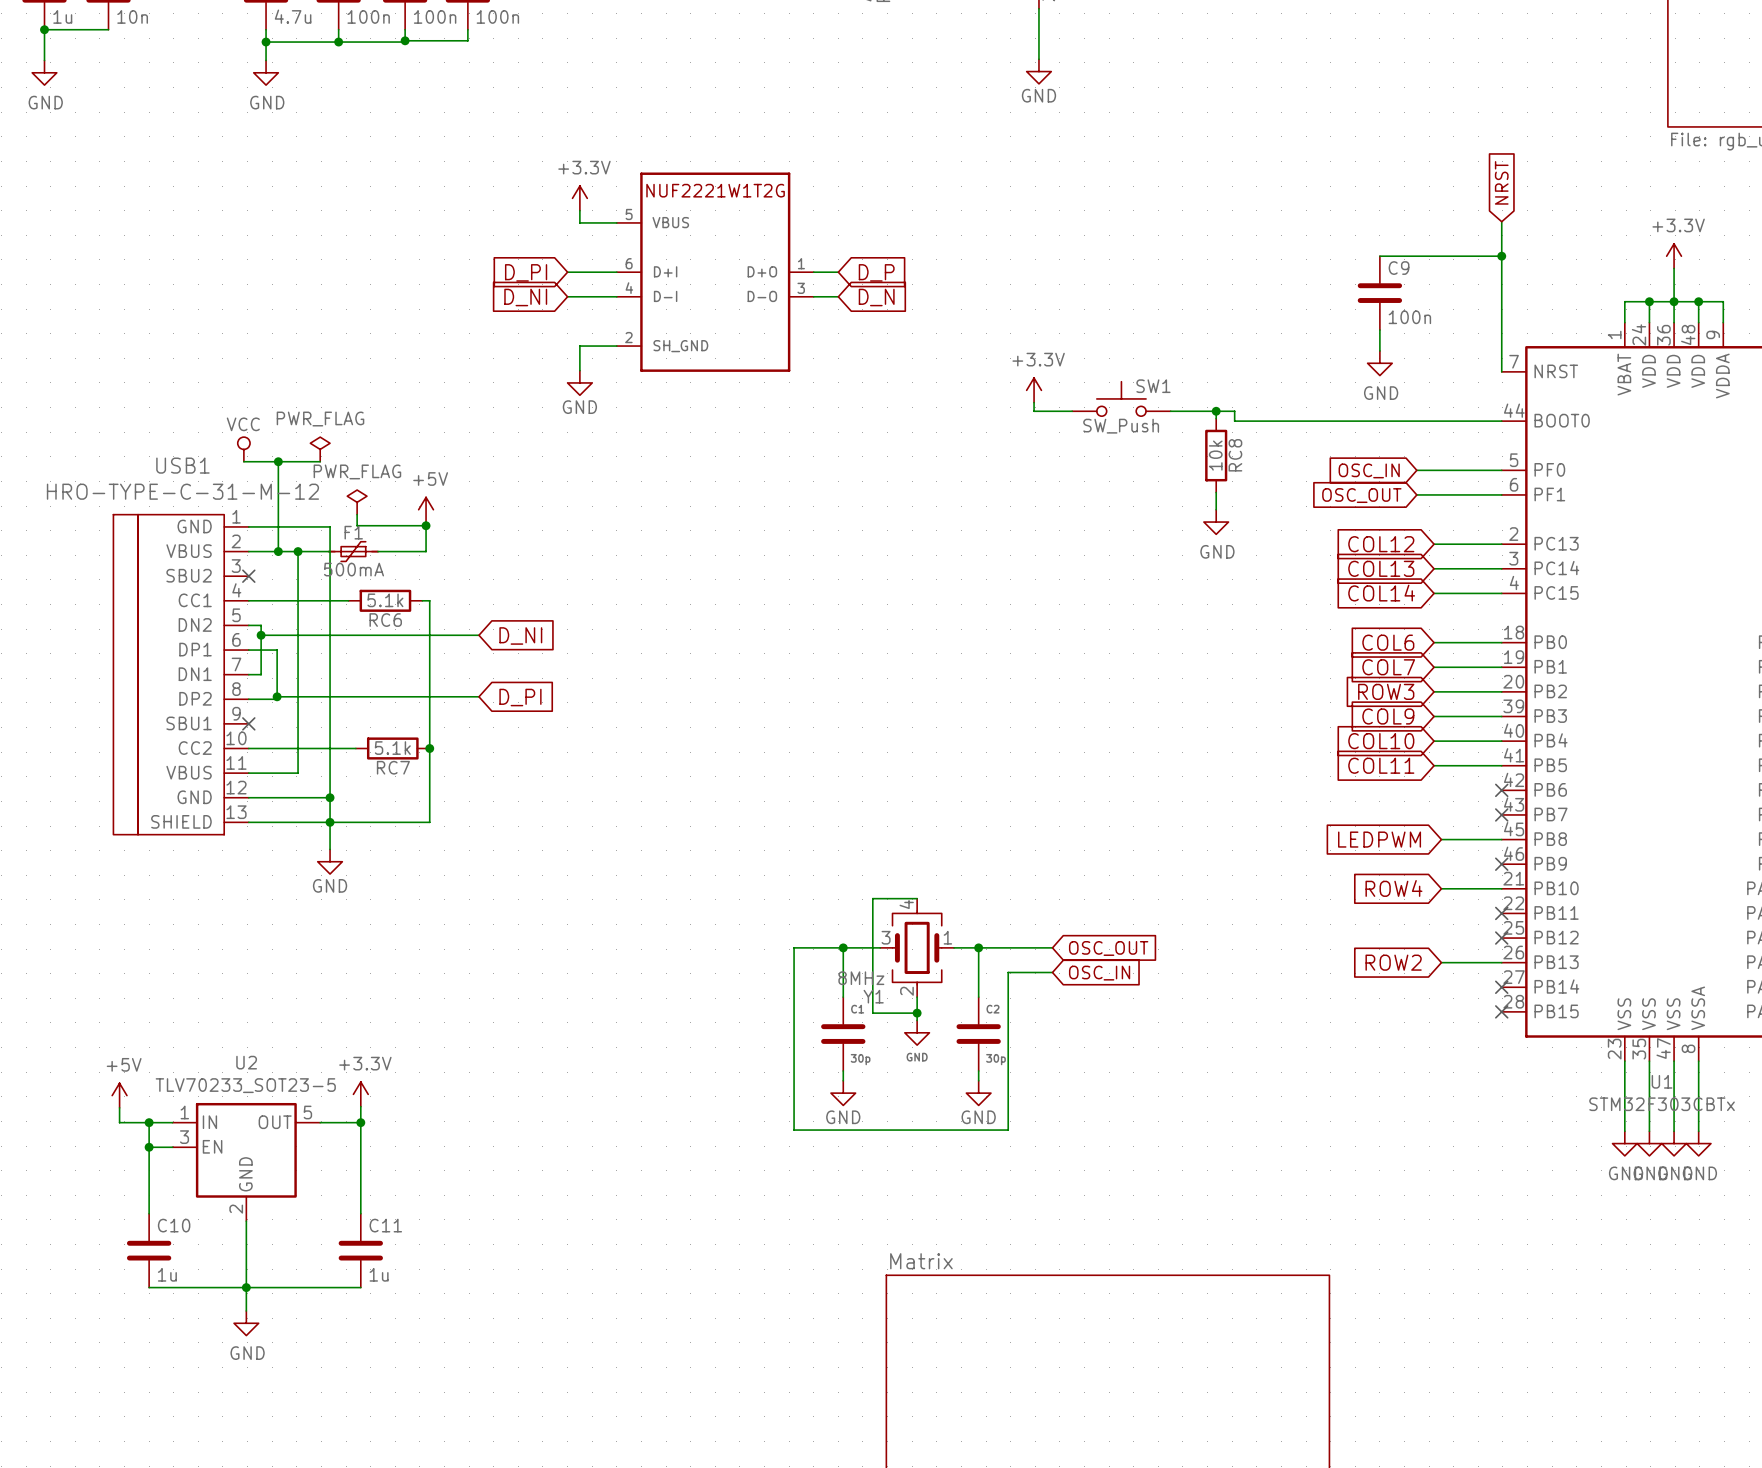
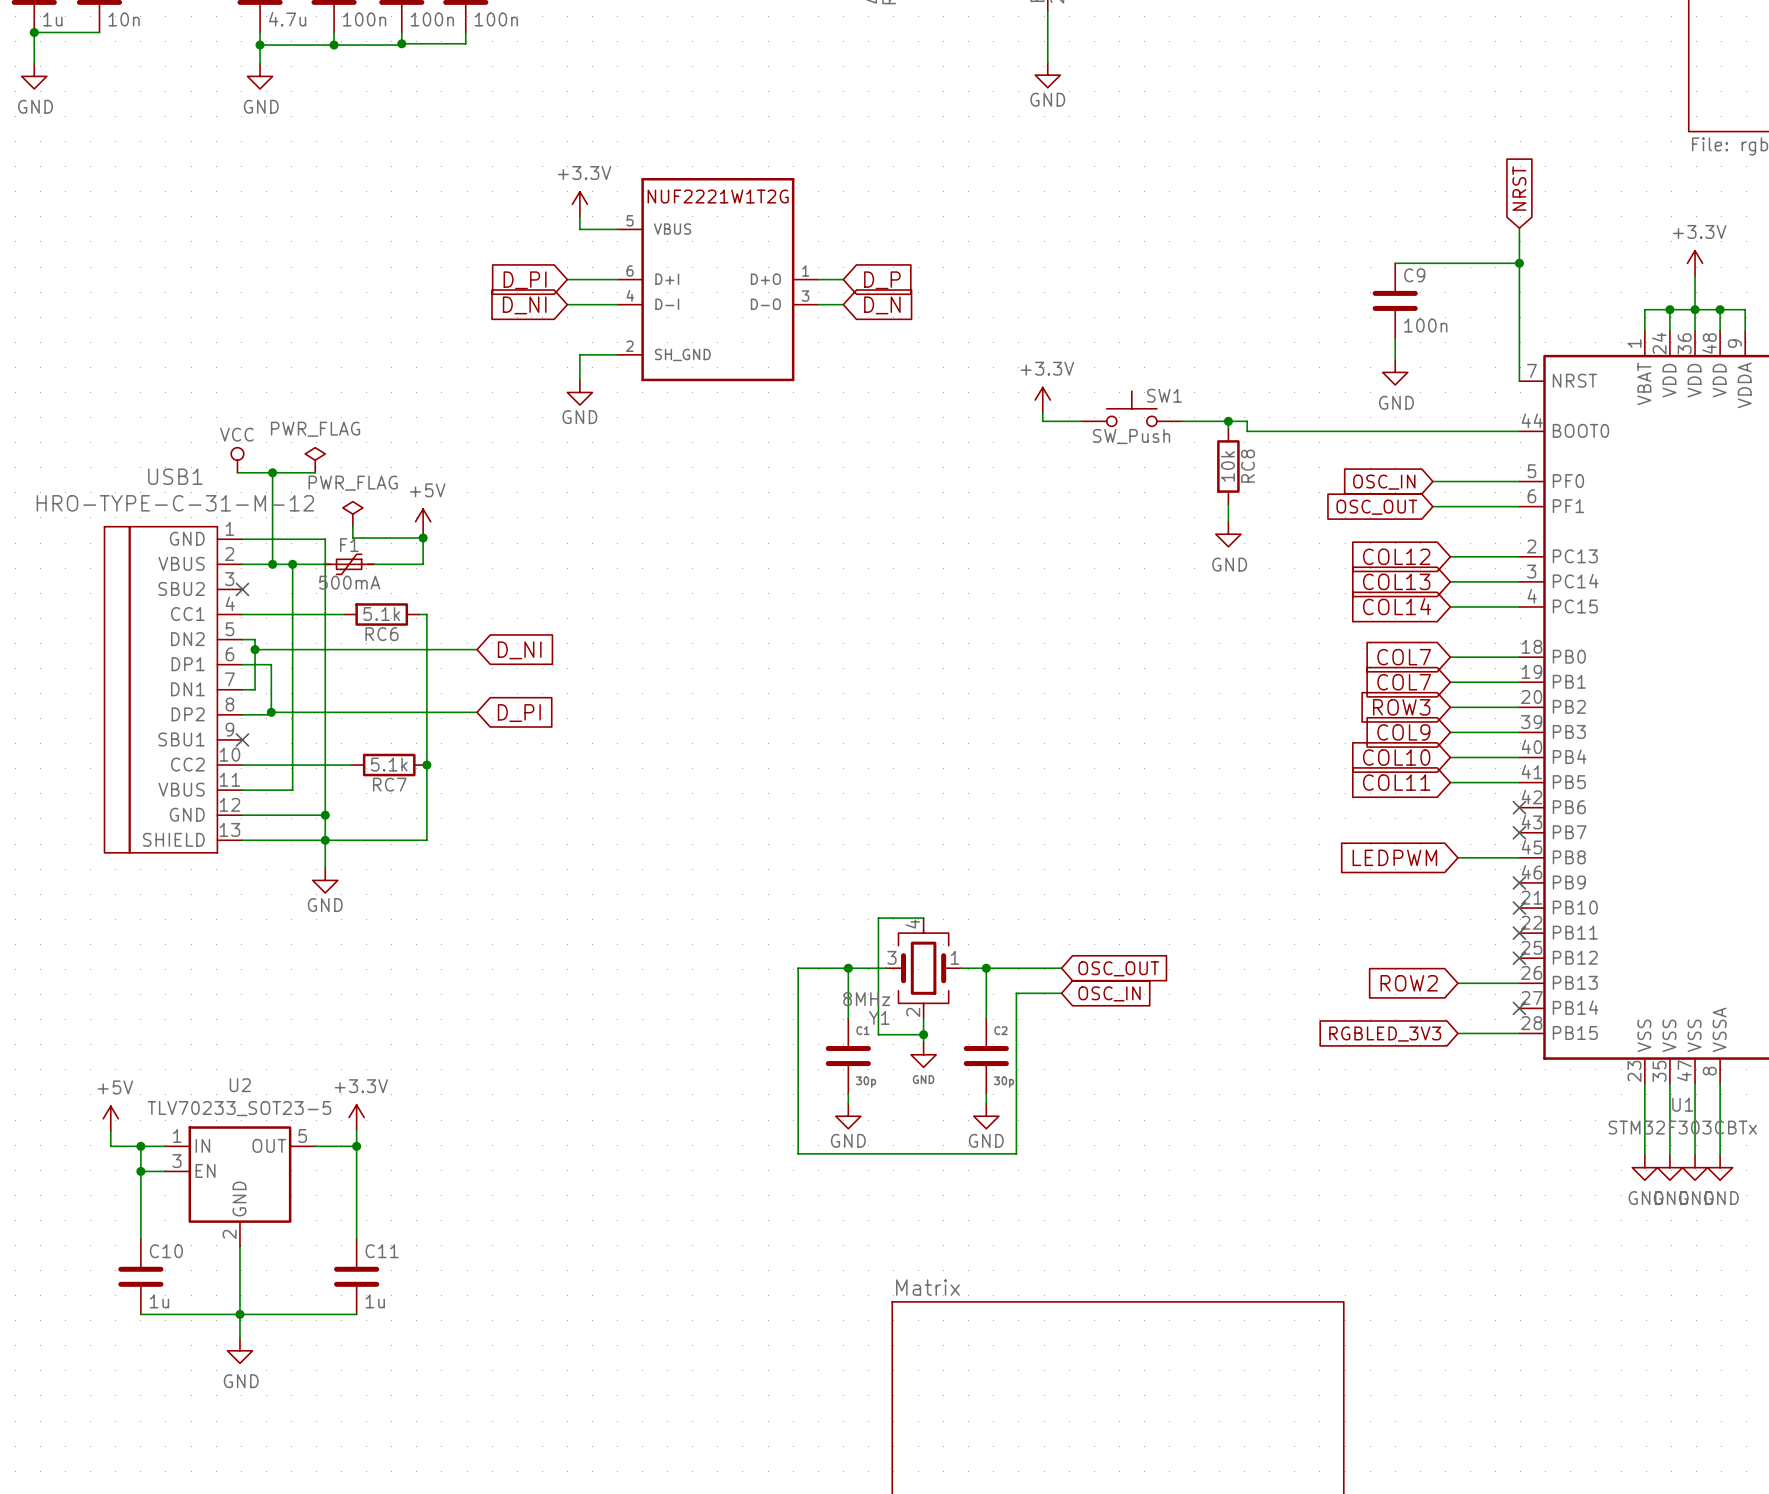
global label: COL6 (1388, 642) -> COL7 (1404, 657)
global label: ROW4 (1393, 888) -> none
wire: (1441, 888) (1501, 888) -> (1457, 1033) (1519, 1033)
no-connect mark: none -> (1519, 908)
no-connect mark: (1501, 1011) -> none
global label: none -> RGBLED_3V3 (1385, 1034)

